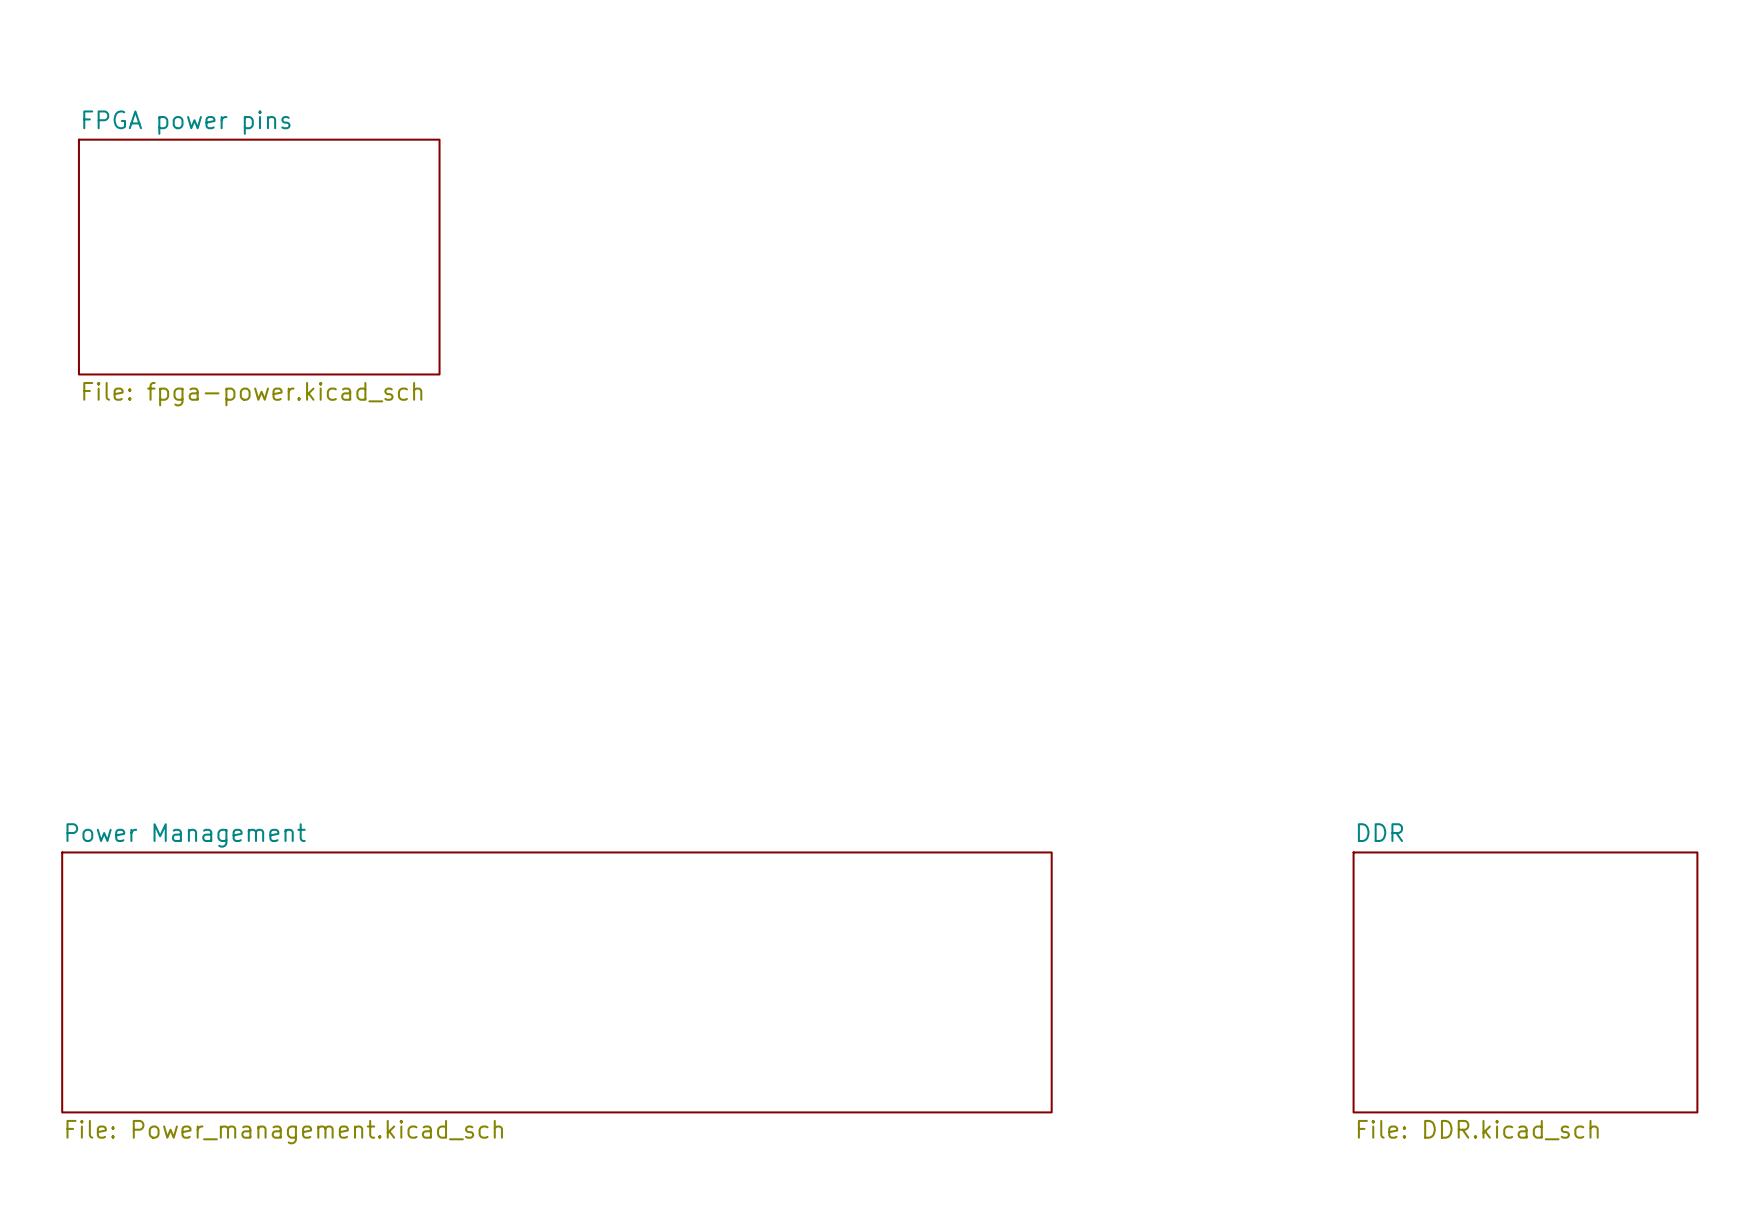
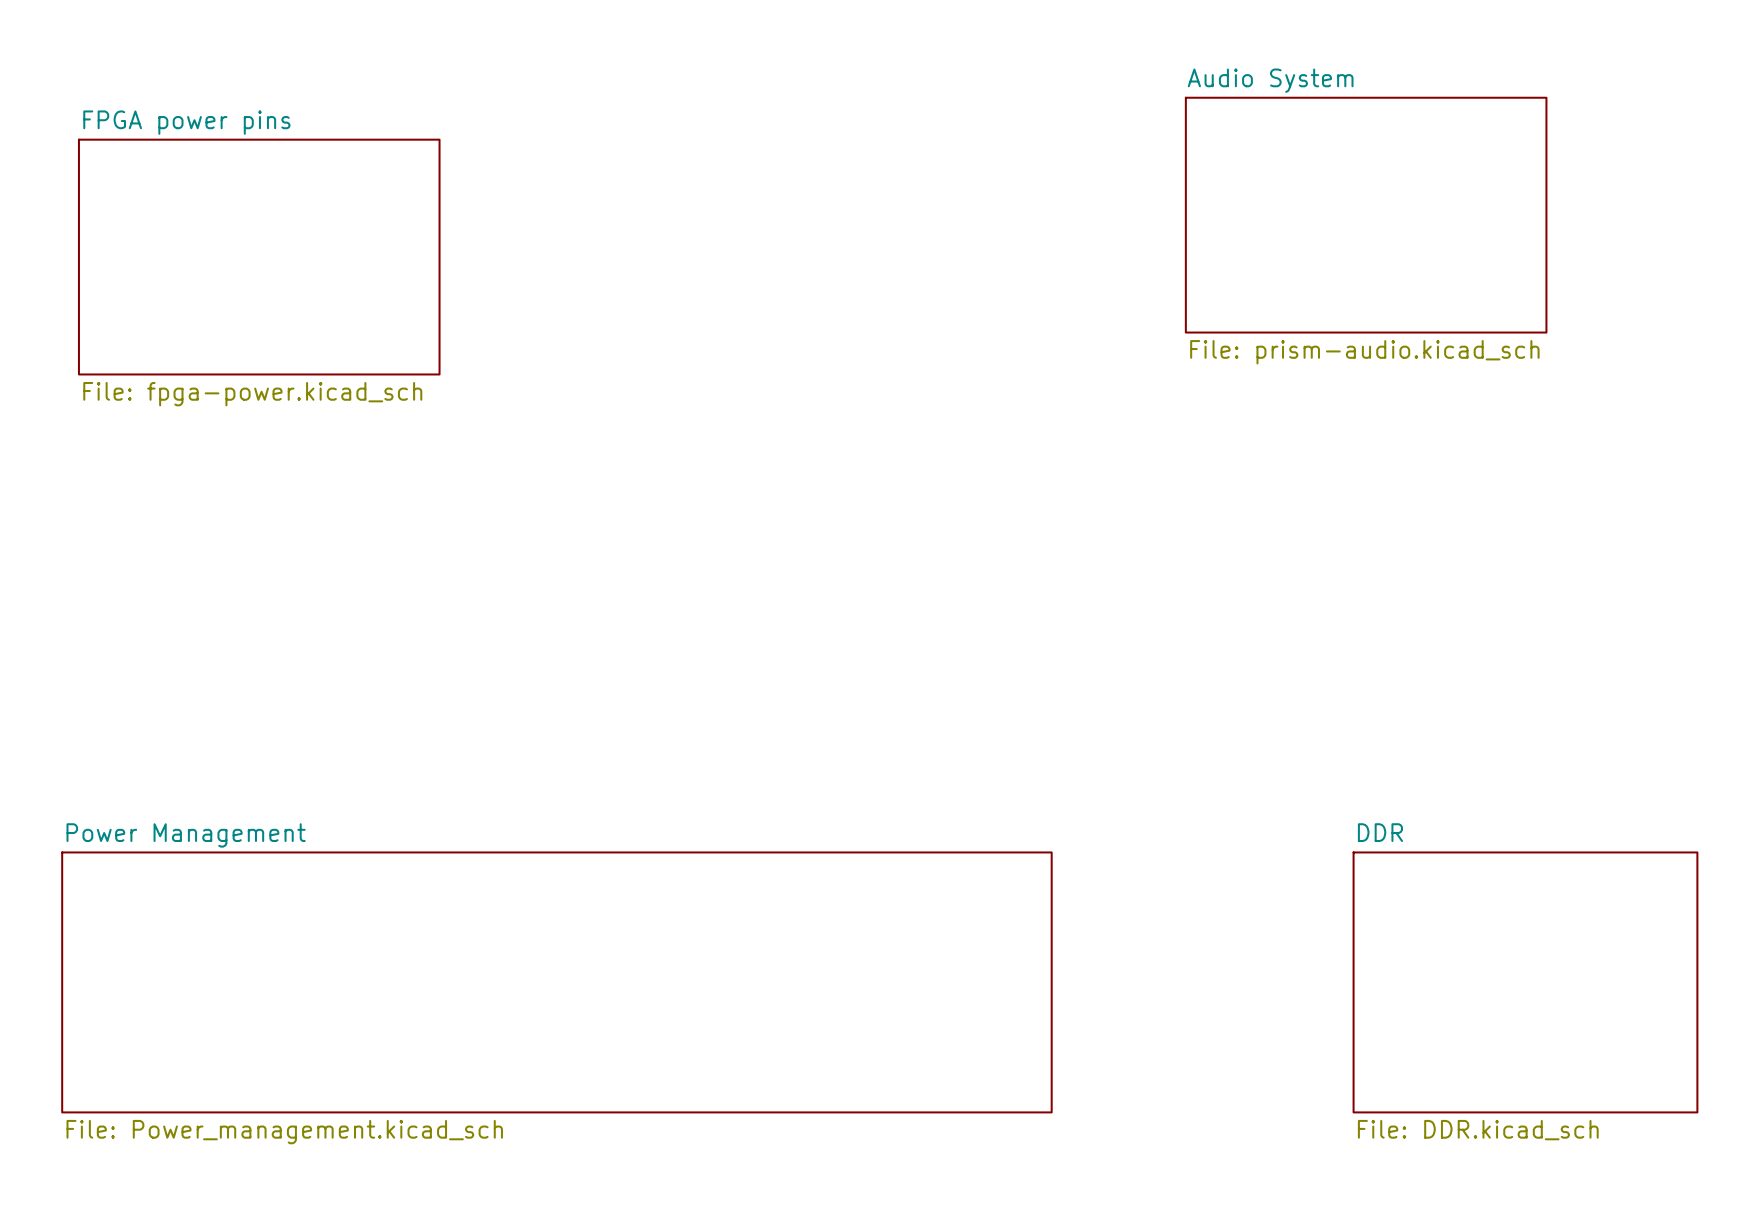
sheet Audio System: none -> File: prism-audio.kicad_sch (1366, 215)

